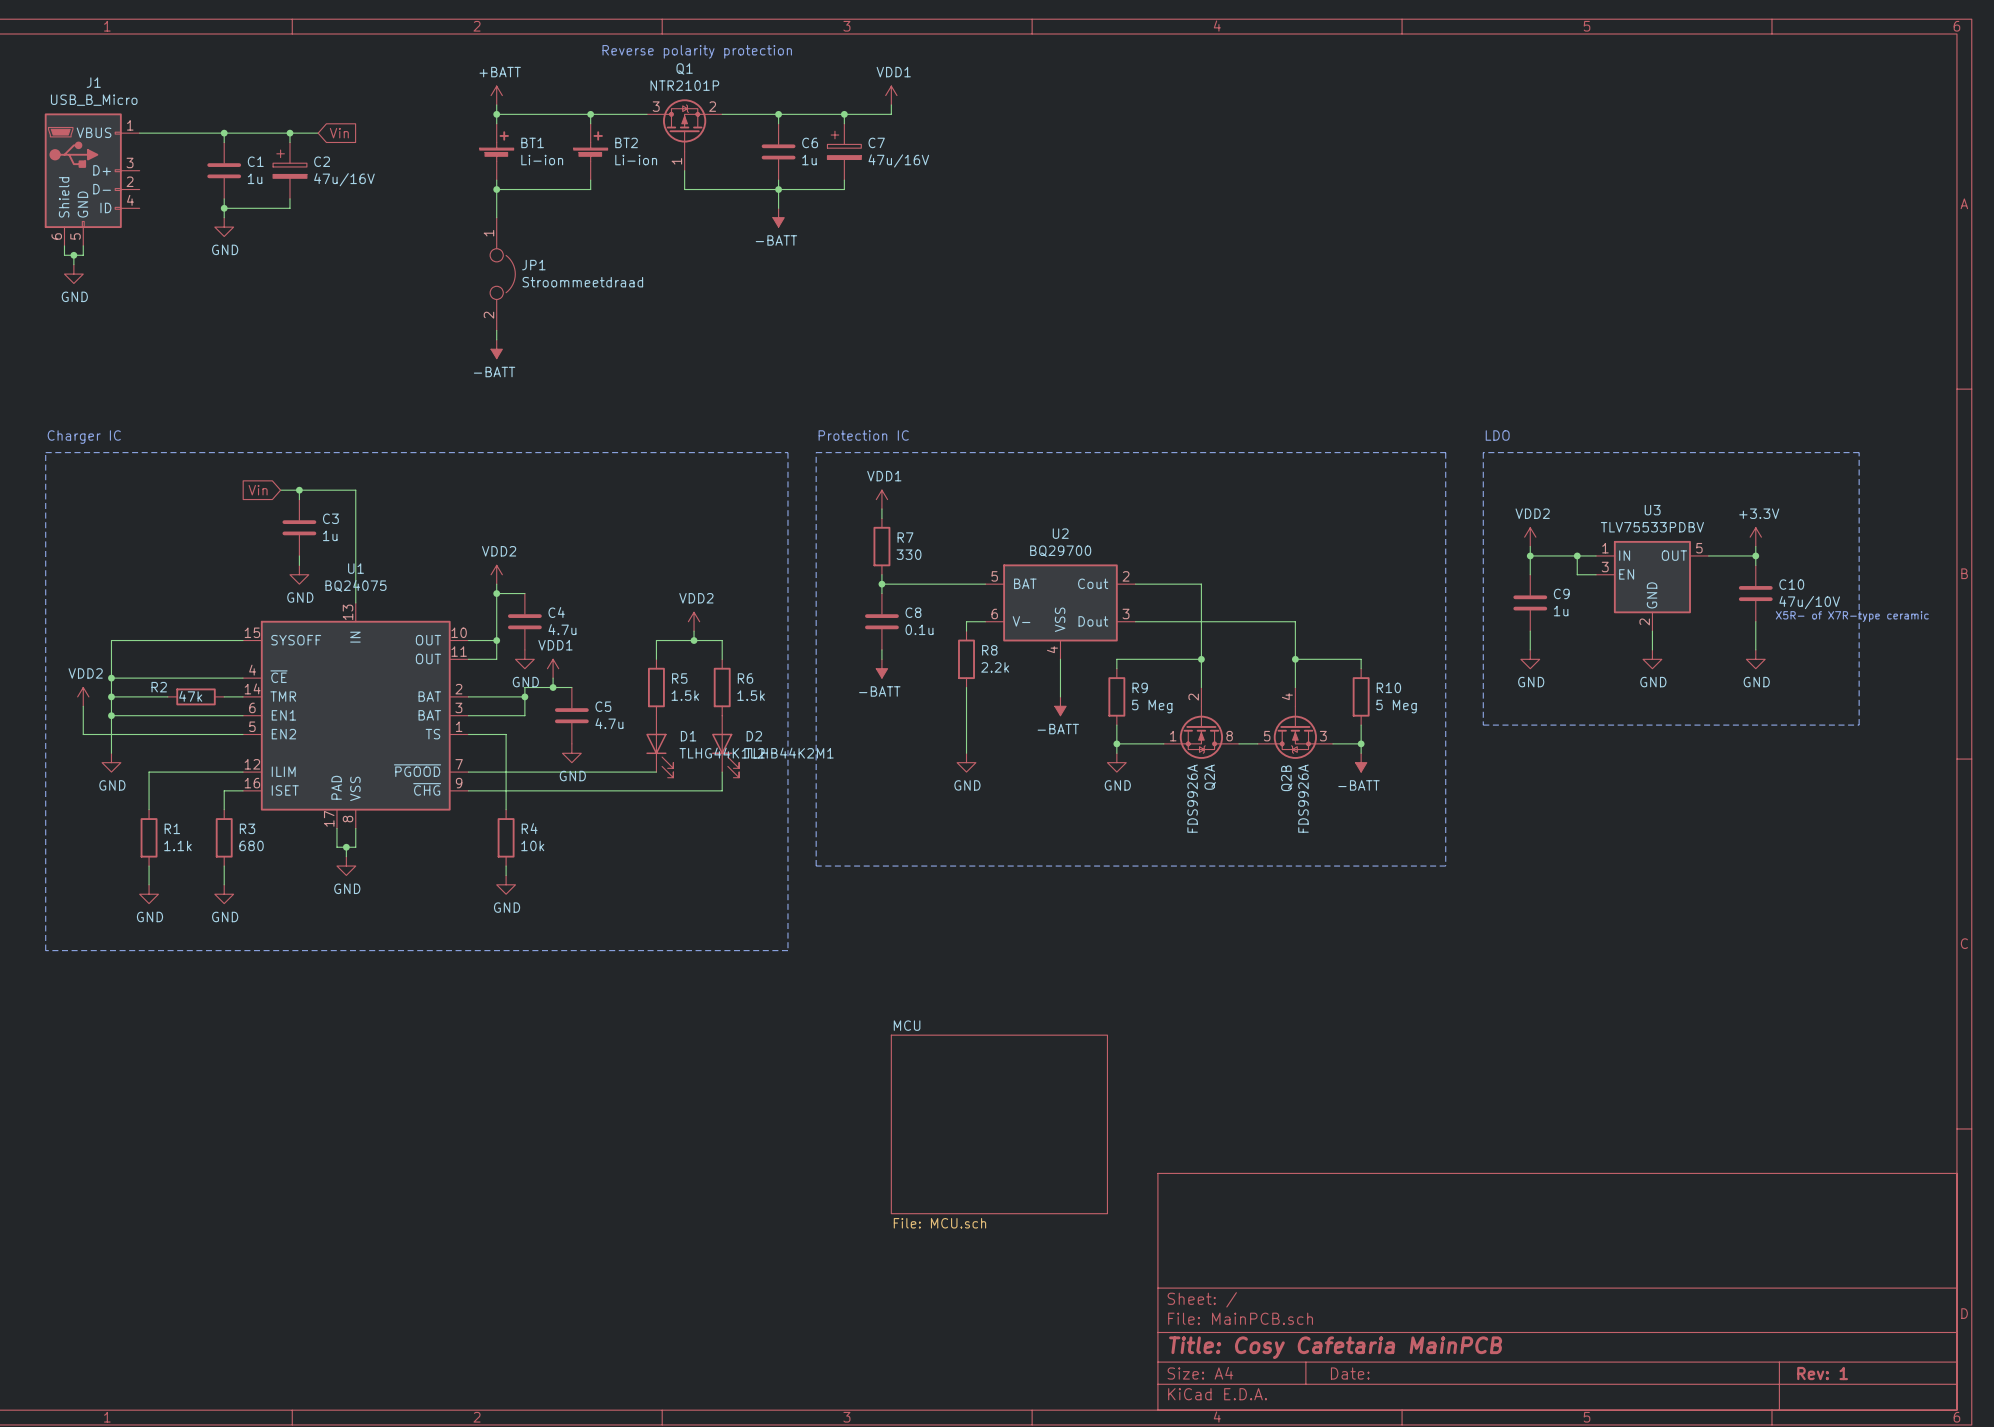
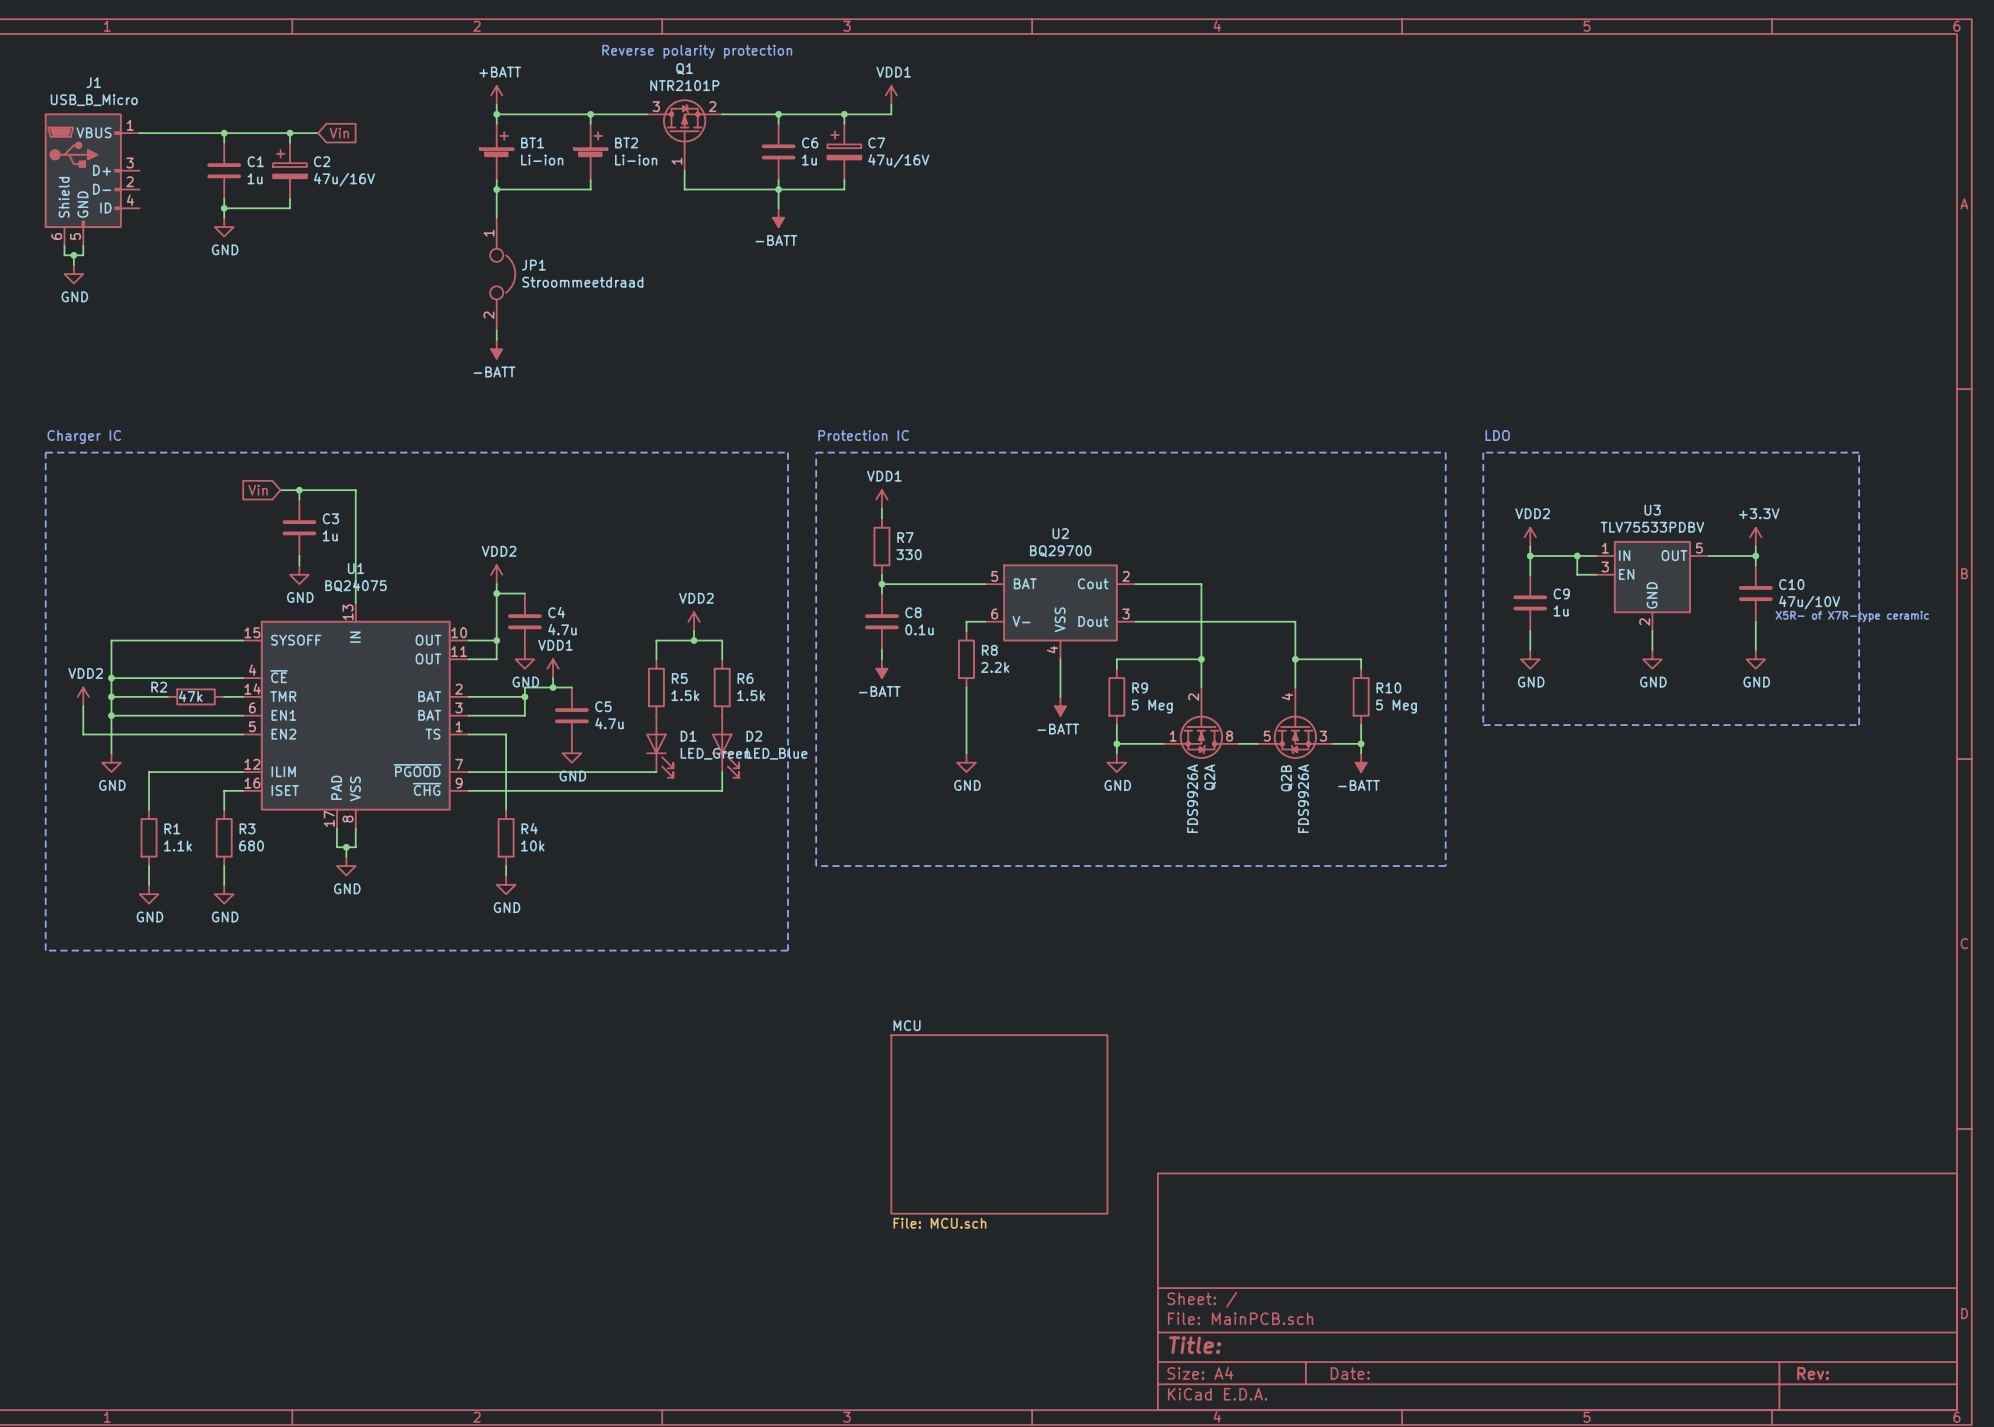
D1 value: TLHG44K1L2 (722, 753) -> LED_Green (715, 753)
D2 value: TLHB44K2M1 (789, 753) -> LED_Blue (776, 753)
title block: Title: Cosy Cafetaria MainPCB (1335, 1347) -> Title: (1195, 1345)
title block: Rev: 1 (1822, 1373) -> Rev: (1813, 1373)

